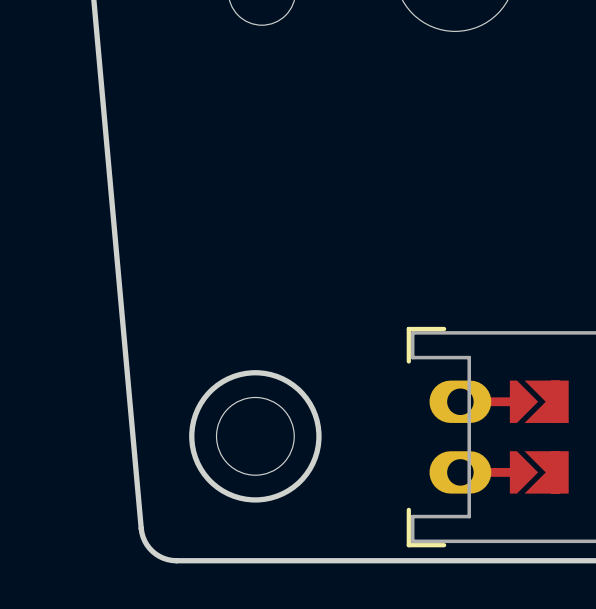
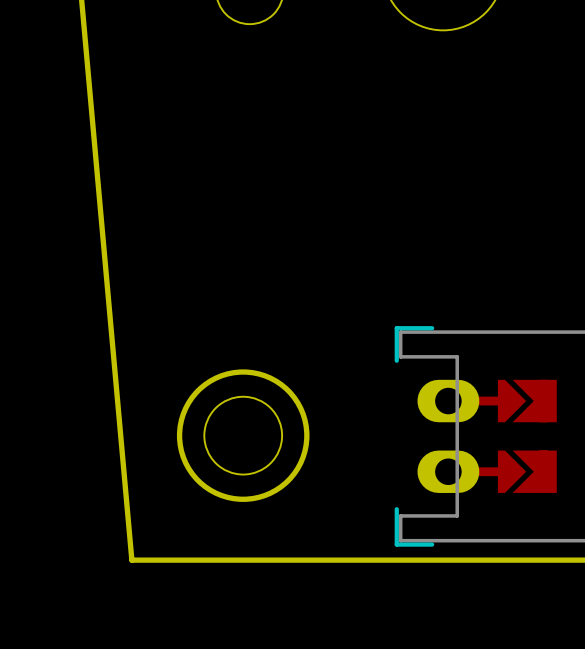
board edge: (141, 528) (144, 541) (152, 551) (163, 558) (176, 560) -> (128, 527) (131, 560) (164, 560)

